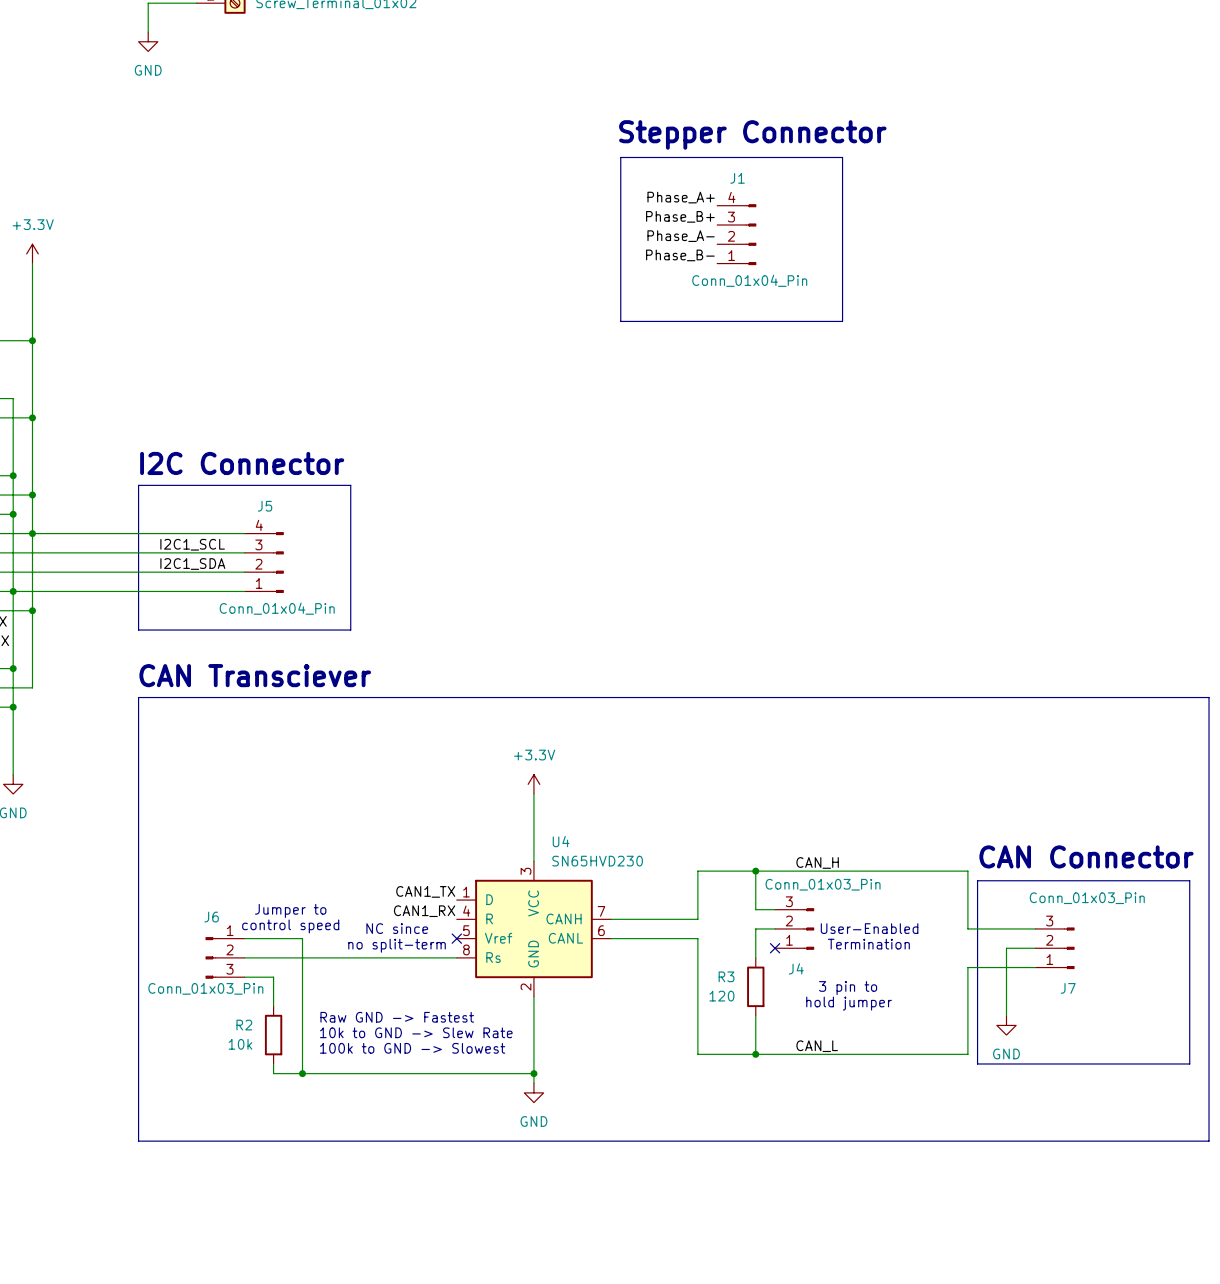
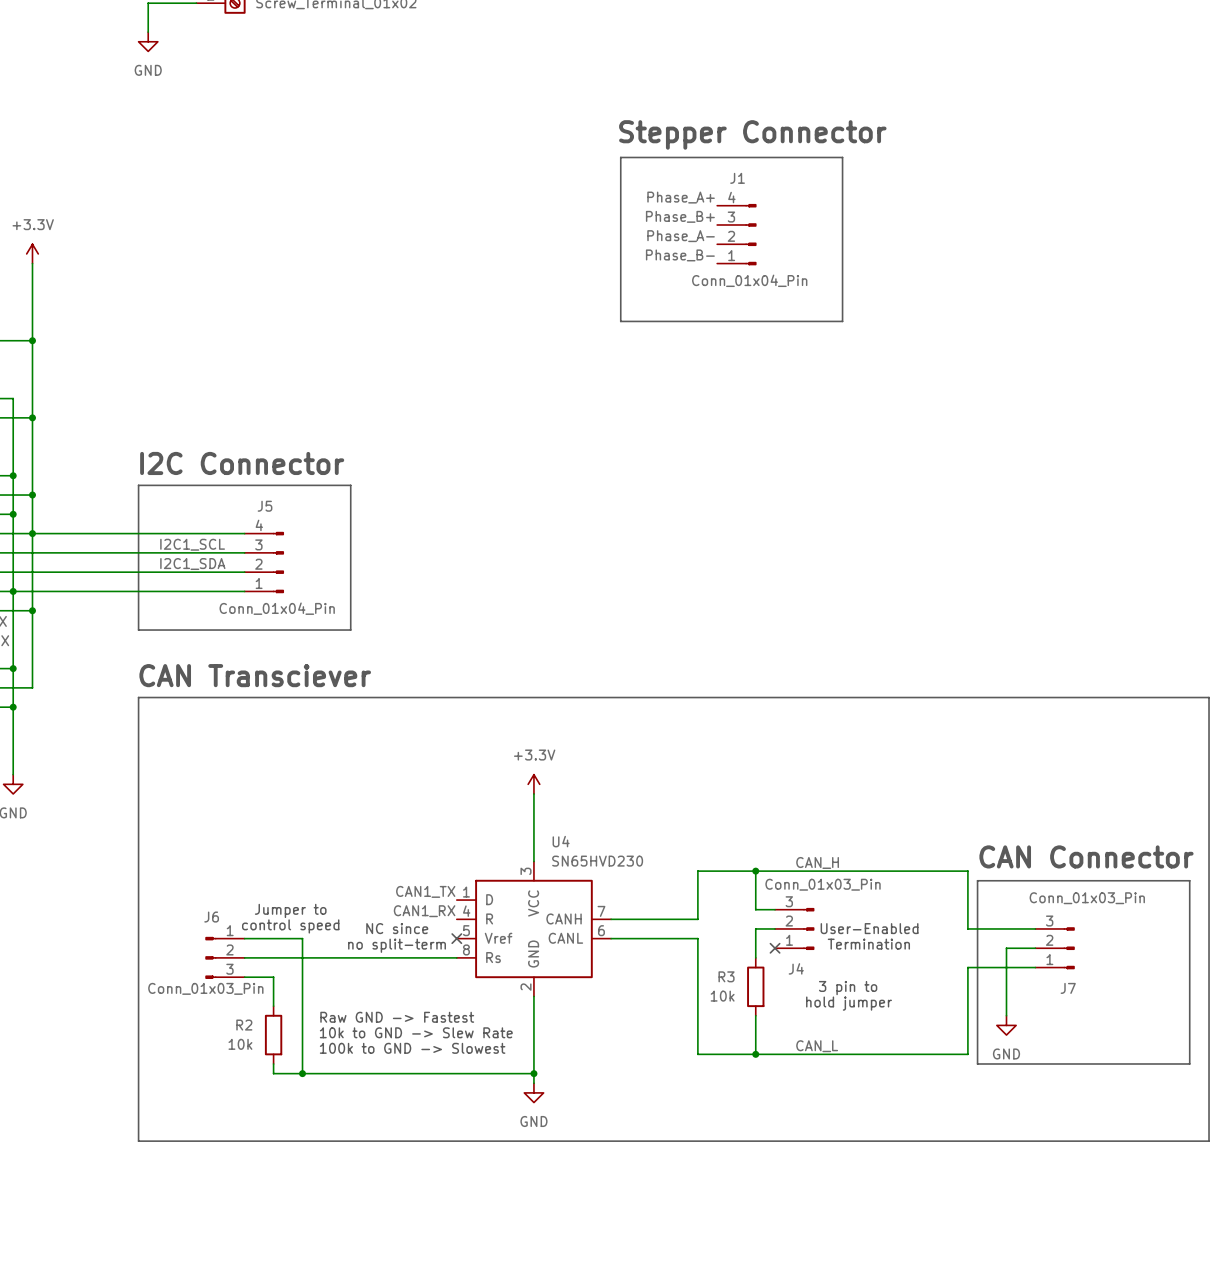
R3 value: 120 (721, 996) -> 10k (722, 996)

